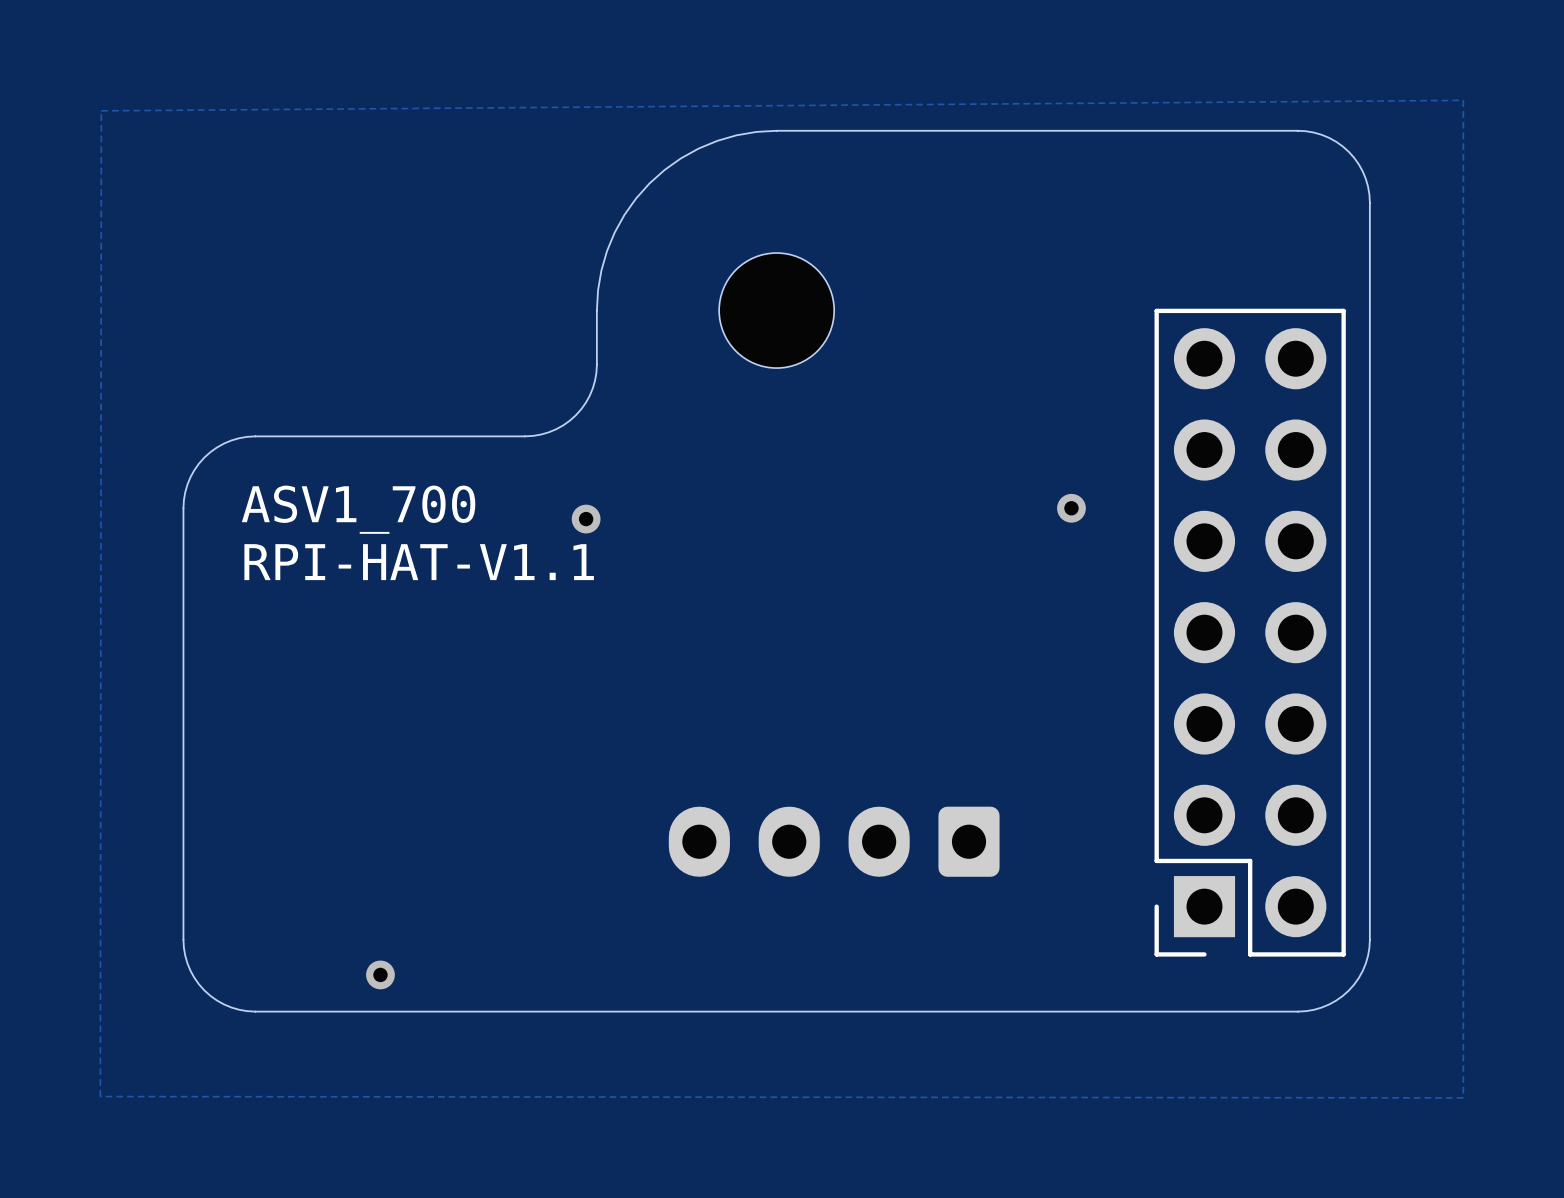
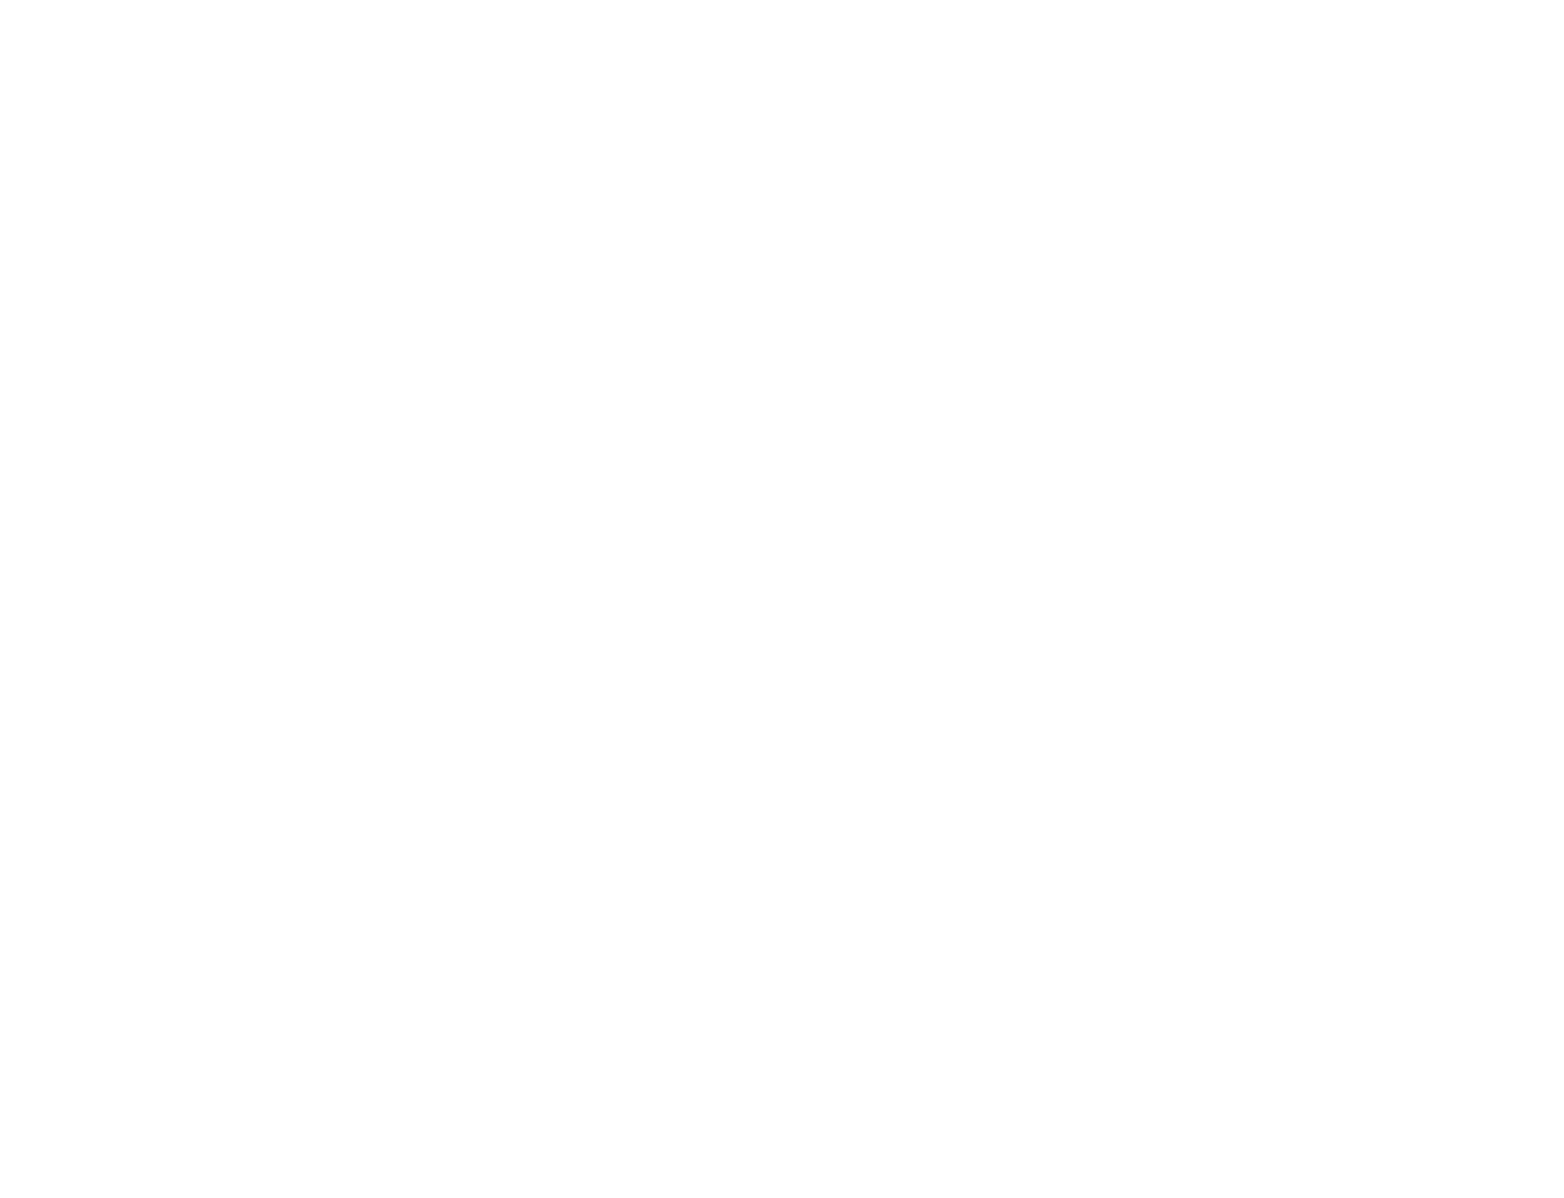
zone outline: (1463, 100) (1463, 1097) (100, 1096) (101, 110) (1463, 100) -> none
board edge: (1297, 130) (776, 130) (736, 135) (717, 140) (698, 148) (664, 169) (636, 198) (614, 232) (606, 251) (598, 290) (595, 380) (589, 395) (581, 409) (563, 425) (541, 434) (525, 436) (247, 436) (224, 443) (210, 452) (199, 463) (190, 477) (185, 492) (183, 508) (183, 939) (187, 963) (199, 984) (210, 995) (224, 1004) (239, 1009) (255, 1011) (1297, 1011) (1321, 1007) (1342, 995) (1354, 984) (1362, 970) (1368, 955) (1369, 939) (1369, 202) (1368, 186) (1362, 171) (1348, 151) (1336, 141) (1321, 134) (1297, 130) -> none
part: (776, 310) -> none
via: (1071, 508) -> none
text: ASV1_700 (358, 509) -> none
via: (586, 519) -> none
text: RPI-HAT-V1.1 (419, 562) -> none
part: (1250, 632) -> none
part: (834, 841) -> none
via: (380, 974) -> none

